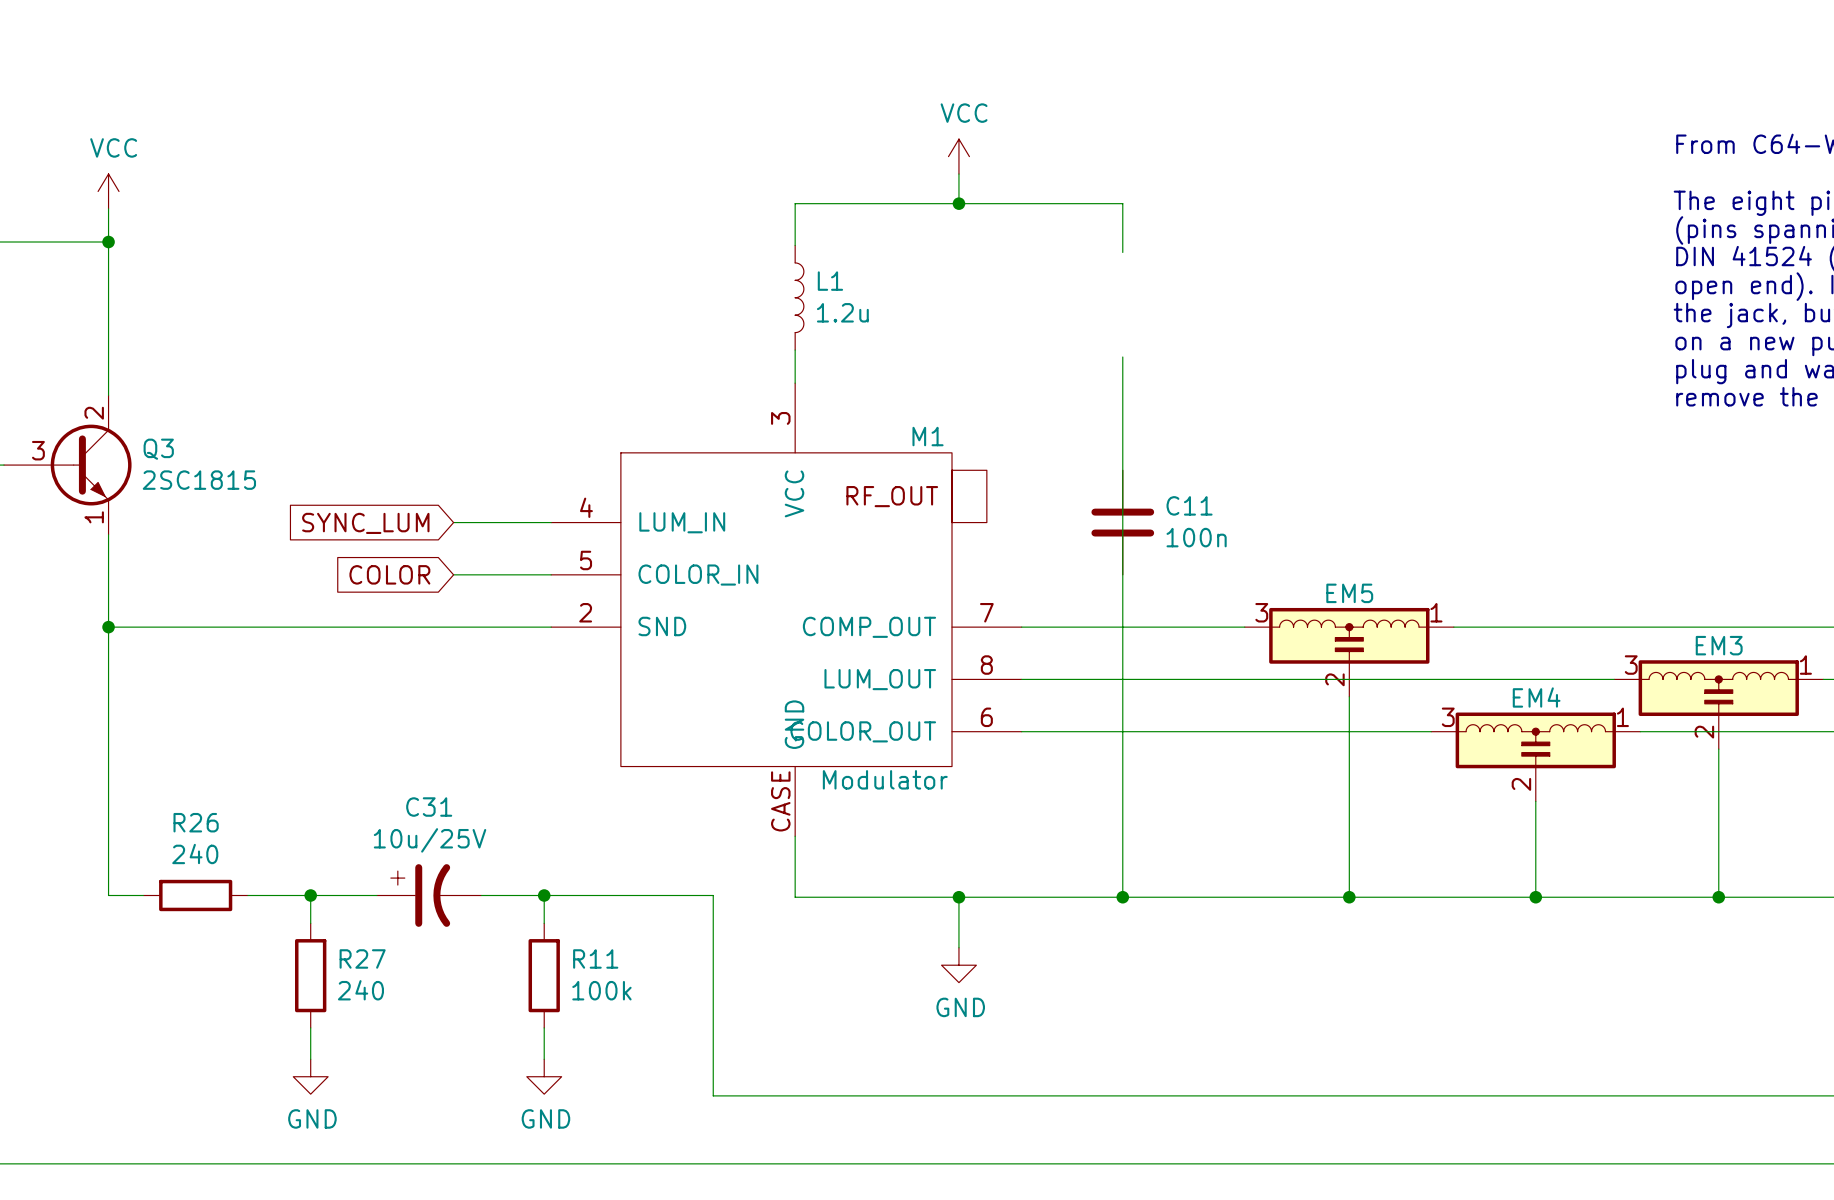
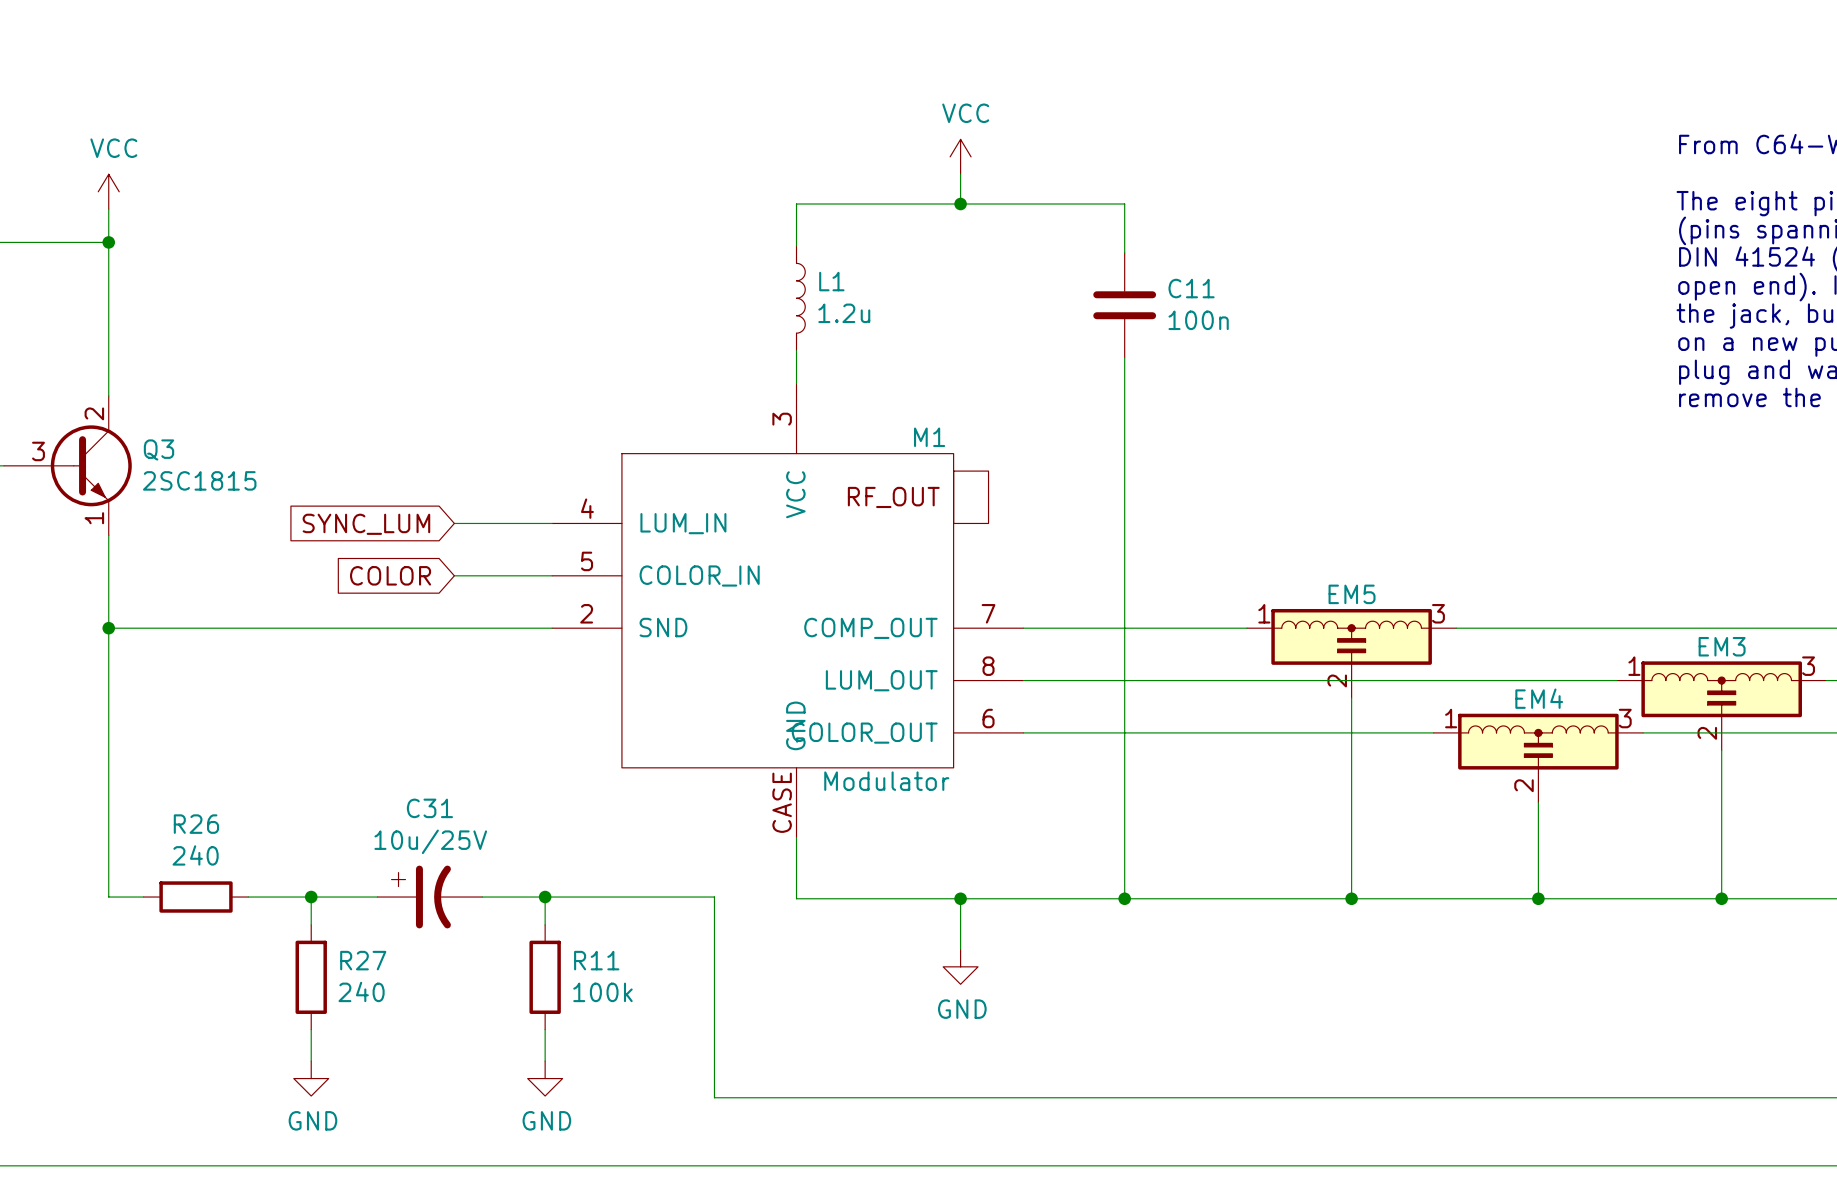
C11 position: (1122, 522) -> (1124, 305)
EM5 flip: as is (1349, 635) -> left-right (1351, 636)
EM3 flip: as is (1718, 688) -> left-right (1721, 689)
EM4 flip: as is (1535, 740) -> left-right (1538, 741)

